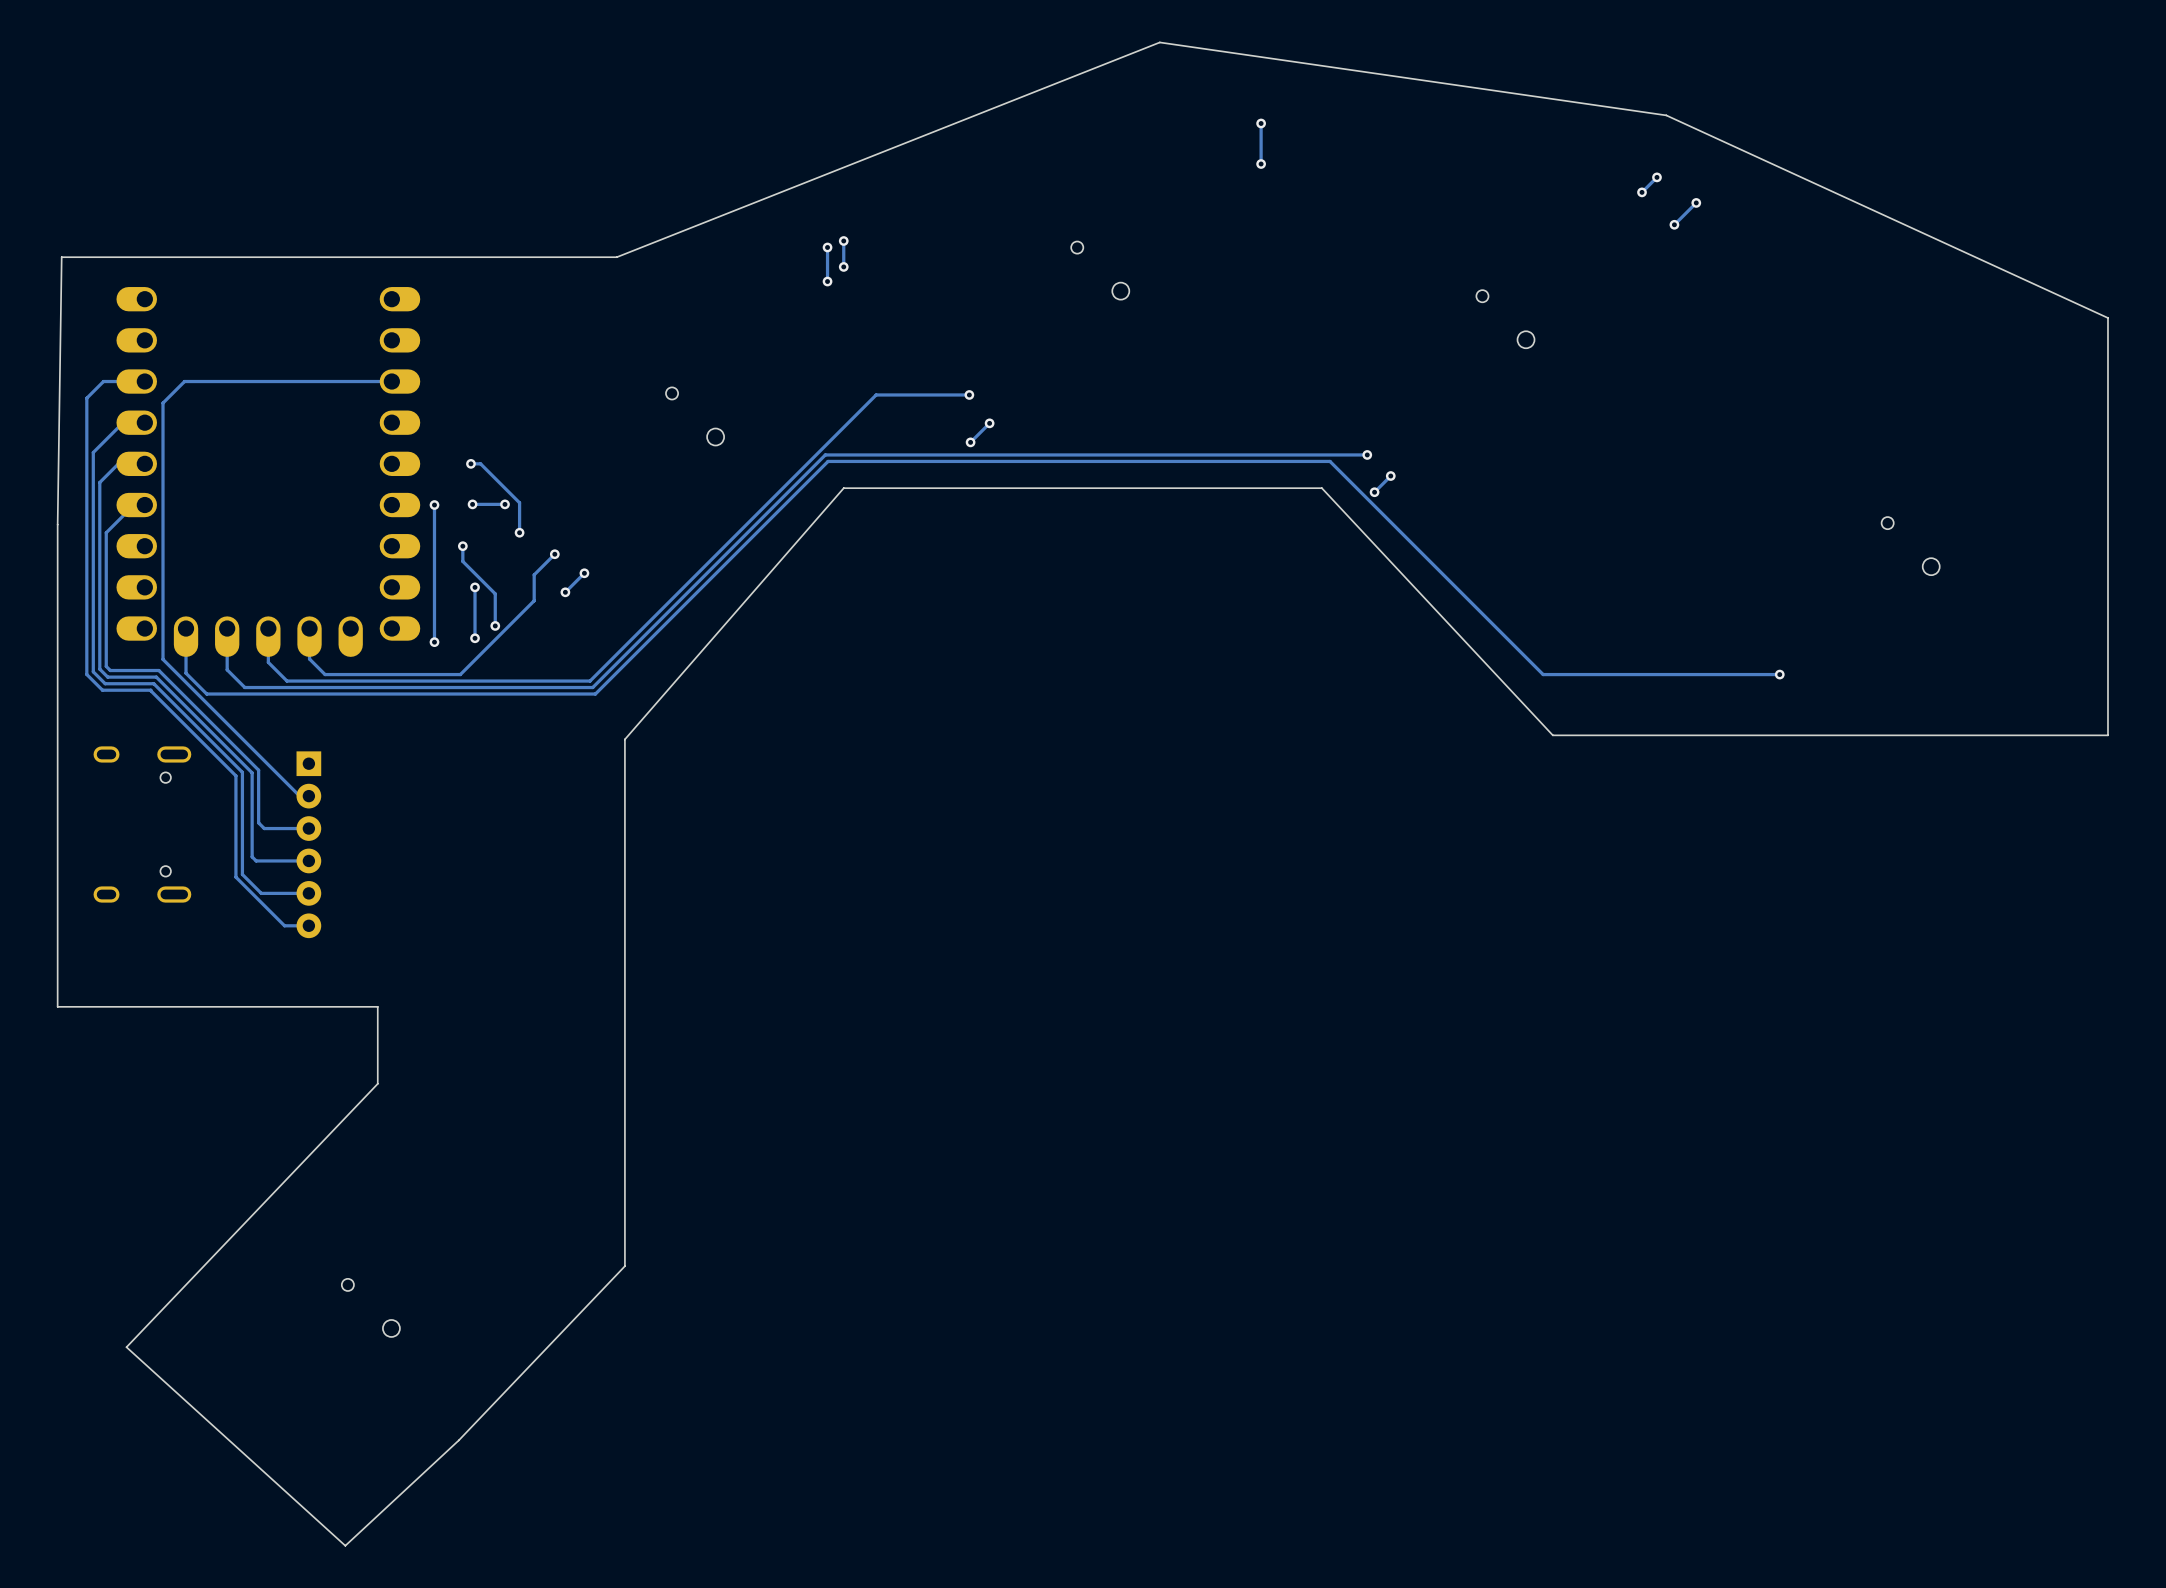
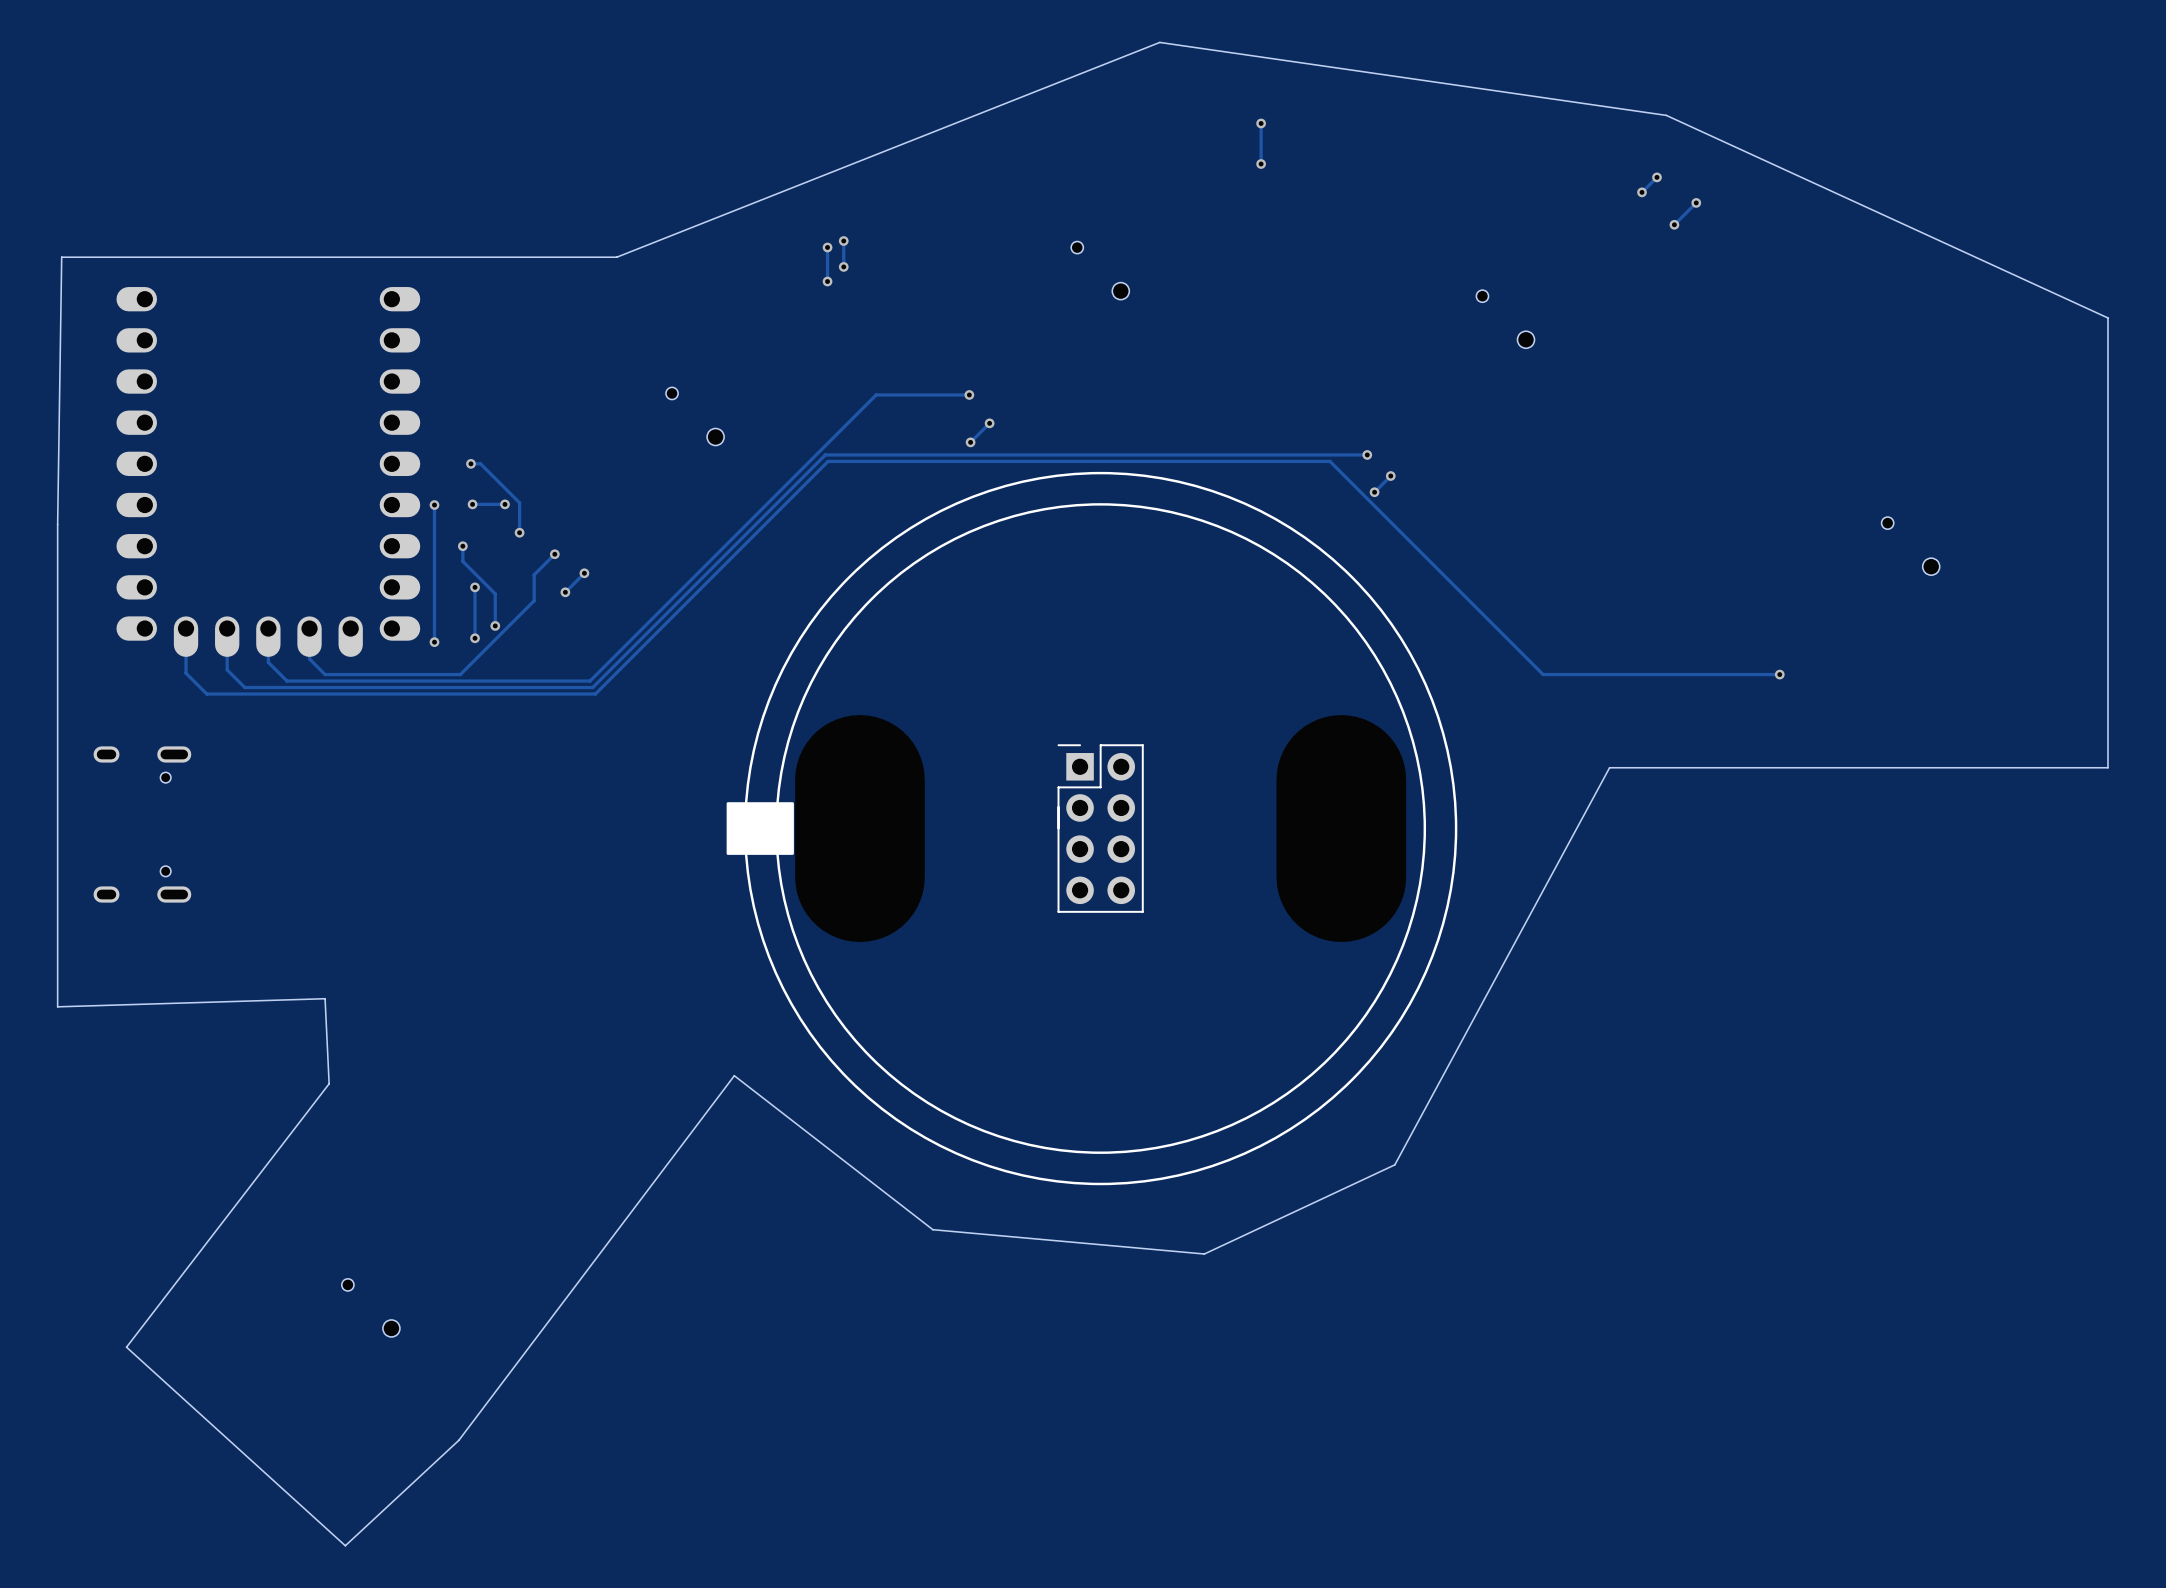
track: (144, 381) (103, 381) (86, 398) (86, 674) (102, 690) (150, 690) (235, 775) (235, 877) (284, 925) (308, 925) -> none
track: (391, 381) (184, 381) (163, 403) (163, 659) (299, 796) (308, 796) -> none
track: (144, 422) (123, 422) (93, 452) (93, 671) (105, 683) (153, 683) (242, 772) (242, 874) (261, 893) (308, 893) -> none
track: (144, 463) (118, 463) (99, 482) (99, 669) (107, 677) (156, 677) (252, 772) (252, 856) (256, 860) (308, 860) -> none
track: (144, 505) (133, 505) (106, 532) (106, 666) (110, 670) (158, 670) (258, 770) (258, 822) (264, 828) (308, 828) -> none
board edge: (2107, 735) (1552, 735) (1321, 488) (843, 488) (624, 739) (624, 1266) (458, 1440) -> (2107, 735) (2107, 767) (1609, 767) (1394, 1164) (1204, 1254) (932, 1229) (734, 1075) (458, 1440)
part: none -> (1091, 828)
part: (308, 844) -> none
board edge: (57, 1006) (377, 1006) (377, 1083) (126, 1347) -> (57, 1006) (325, 998) (329, 1083) (126, 1347)

